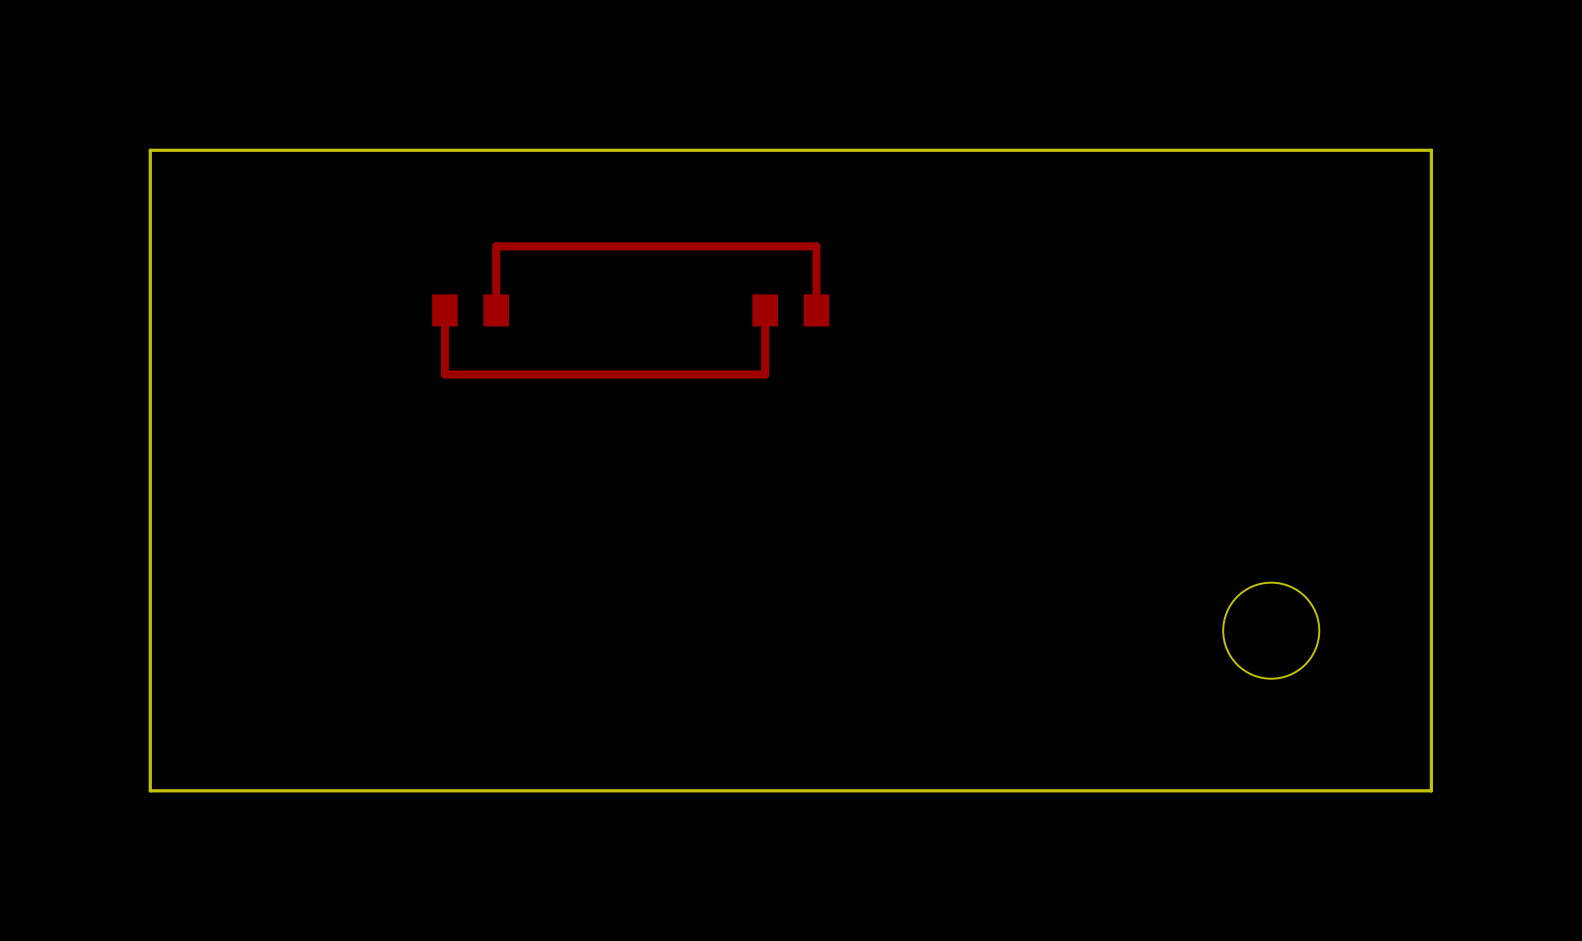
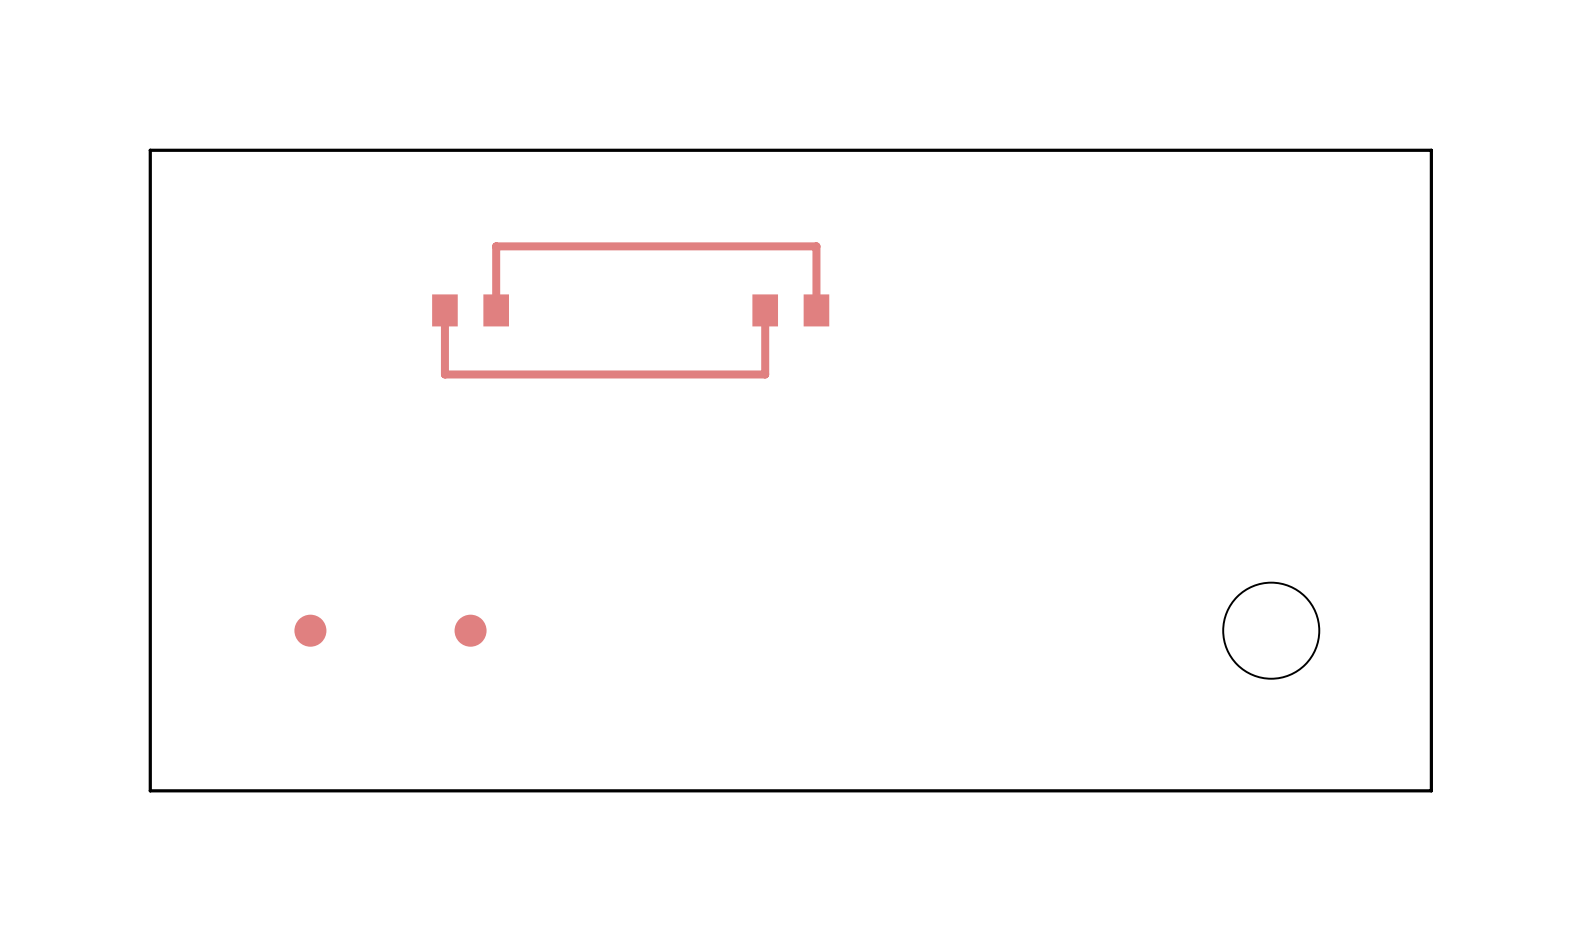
part: none -> (310, 630)
part: none -> (470, 630)

